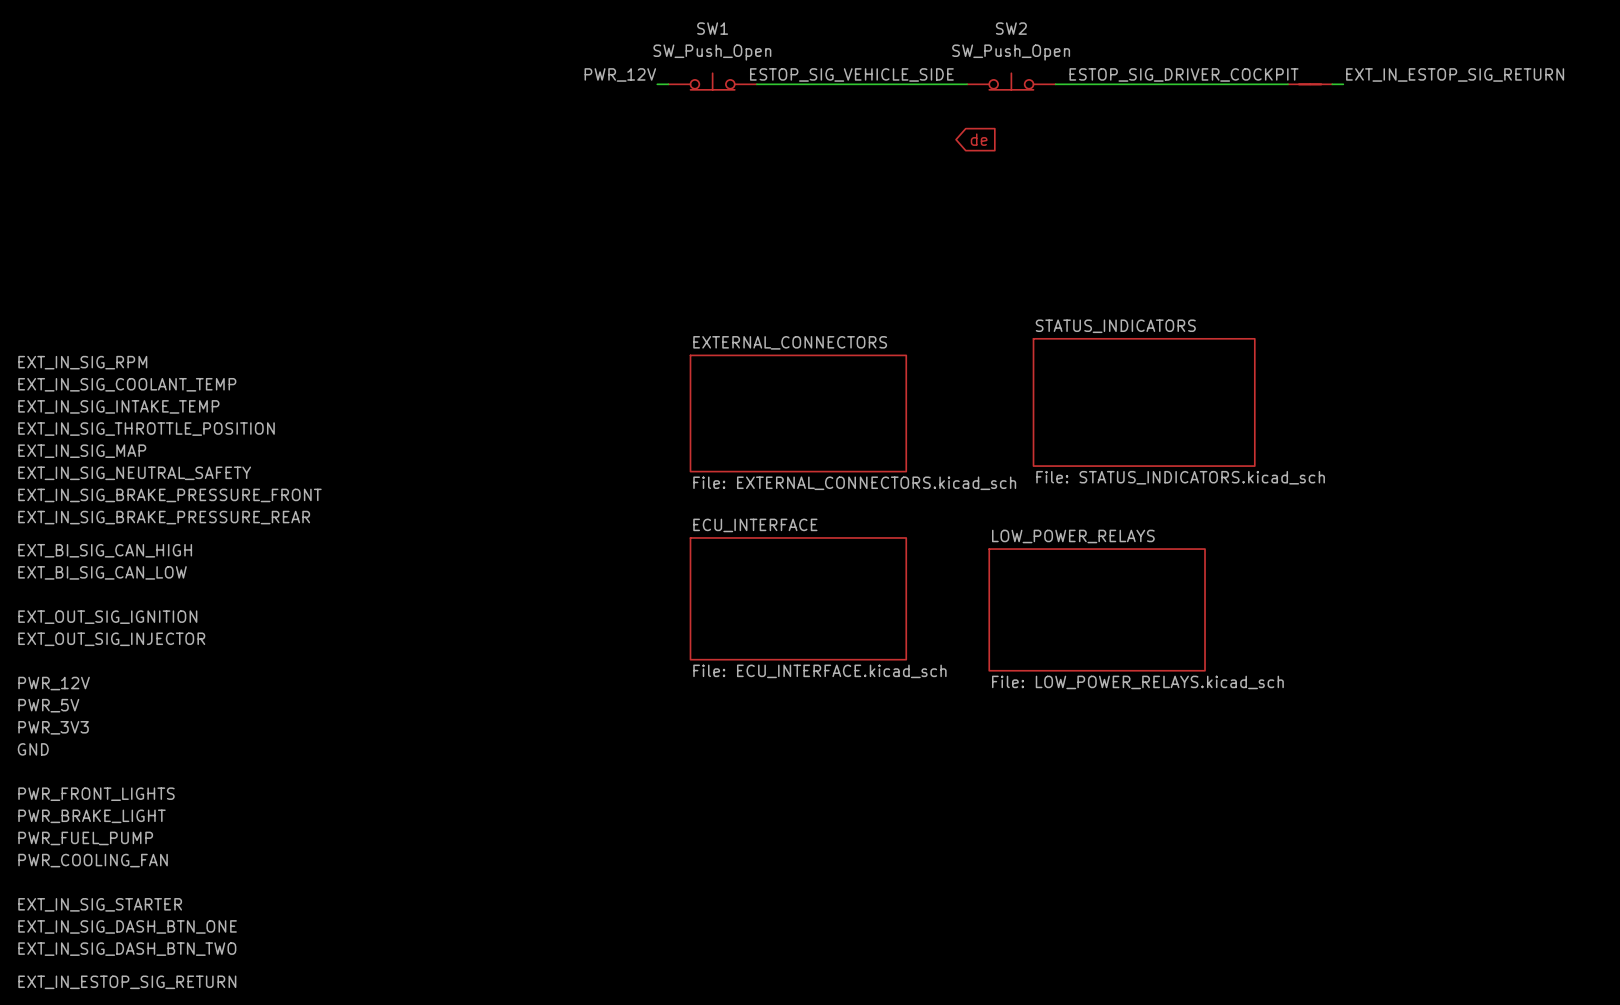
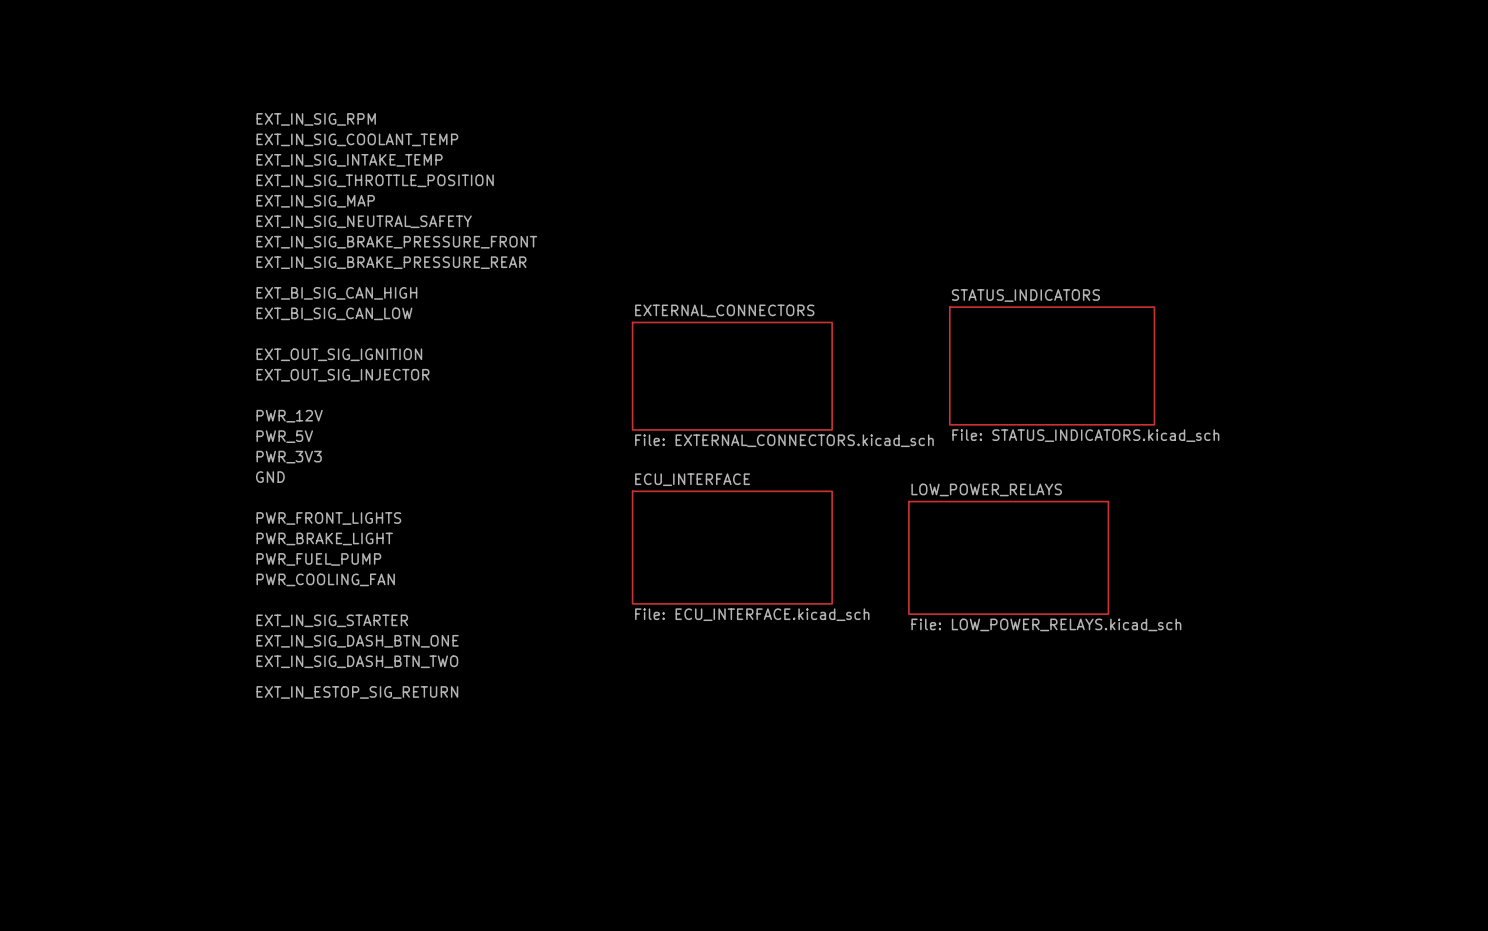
label: PWR_12V (620, 74) -> none
label: ESTOP_SIG_VEHICLE_SIDE (851, 74) -> none
label: ESTOP_SIG_DRIVER_COCKPIT (1184, 74) -> none
label: EXT_IN_ESTOP_SIG_RETURN (1455, 74) -> none
SW1: SW_Push_Open (712, 81) -> none
SW2: SW_Push_Open (1011, 81) -> none
wire: (657, 84) (668, 84) -> none
wire: (756, 84) (967, 84) -> none
wire: (1055, 84) (1288, 84) -> none
part: (1310, 84) -> none
wire: (1332, 84) (1343, 84) -> none
label: none -> EXT_IN_SIG_RPM (316, 119)
global label: de (979, 139) -> none
label: none -> EXT_IN_SIG_COOLANT_TEMP (357, 139)
label: none -> EXT_IN_SIG_INTAKE_TEMP (349, 160)
label: none -> EXT_IN_SIG_THROTTLE_POSITION (375, 180)
label: none -> EXT_IN_SIG_MAP (315, 201)
label: none -> EXT_IN_SIG_NEUTRAL_SAFETY (364, 221)
label: none -> EXT_IN_SIG_BRAKE_PRESSURE_FRONT (396, 242)
label: none -> EXT_IN_SIG_BRAKE_PRESSURE_REAR (391, 262)
label: none -> EXT_BI_SIG_CAN_HIGH (336, 293)
label: none -> EXT_BI_SIG_CAN_LOW (334, 313)
label: EXT_IN_SIG_RPM (82, 362) -> none
label: EXT_IN_SIG_COOLANT_TEMP (127, 384) -> none
label: none -> EXT_OUT_SIG_IGNITION (339, 354)
label: EXT_IN_SIG_INTAKE_TEMP (118, 406) -> none
label: none -> EXT_OUT_SIG_INJECTOR (342, 375)
label: EXT_IN_SIG_THROTTLE_POSITION (146, 429) -> none
label: EXT_IN_SIG_MAP (82, 451) -> none
label: none -> PWR_12V (289, 416)
label: EXT_IN_SIG_NEUTRAL_SAFETY (134, 473) -> none
label: none -> PWR_5V (284, 436)
label: EXT_IN_SIG_BRAKE_PRESSURE_FRONT (169, 495) -> none
label: none -> PWR_3V3 (289, 457)
label: EXT_IN_SIG_BRAKE_PRESSURE_REAR (164, 517) -> none
label: none -> GND (270, 477)
label: EXT_BI_SIG_CAN_HIGH (105, 550) -> none
label: none -> PWR_FRONT_LIGHTS (328, 518)
label: EXT_BI_SIG_CAN_LOW (102, 572) -> none
label: none -> PWR_BRAKE_LIGHT (324, 538)
label: none -> PWR_FUEL_PUMP (318, 559)
label: EXT_OUT_SIG_IGNITION (107, 617) -> none
label: none -> PWR_COOLING_FAN (325, 579)
label: EXT_OUT_SIG_INJECTOR (111, 639) -> none
label: none -> EXT_IN_SIG_STARTER (332, 620)
label: PWR_12V (54, 683) -> none
label: none -> EXT_IN_SIG_DASH_BTN_ONE (357, 641)
label: PWR_5V (48, 705) -> none
label: none -> EXT_IN_SIG_DASH_BTN_TWO (357, 661)
label: PWR_3V3 (53, 727) -> none
label: GND (33, 749) -> none
label: none -> EXT_IN_ESTOP_SIG_RETURN (357, 692)
label: PWR_FRONT_LIGHTS (96, 794) -> none
label: PWR_BRAKE_LIGHT (92, 816) -> none
label: PWR_FUEL_PUMP (85, 838) -> none
label: PWR_COOLING_FAN (93, 860) -> none
label: EXT_IN_SIG_STARTER (100, 904) -> none
label: EXT_IN_SIG_DASH_BTN_ONE (127, 926) -> none
label: EXT_IN_SIG_DASH_BTN_TWO (127, 949) -> none
label: EXT_IN_ESTOP_SIG_RETURN (127, 982) -> none

